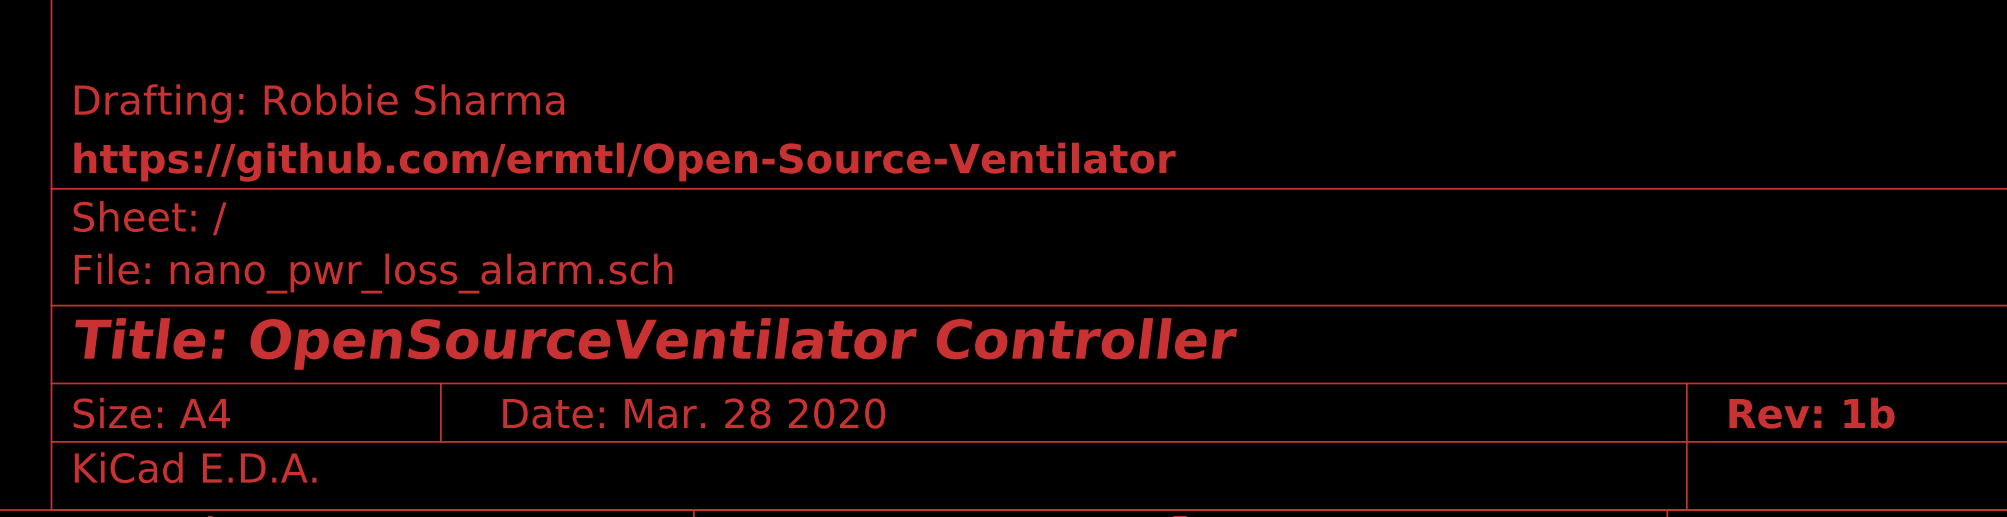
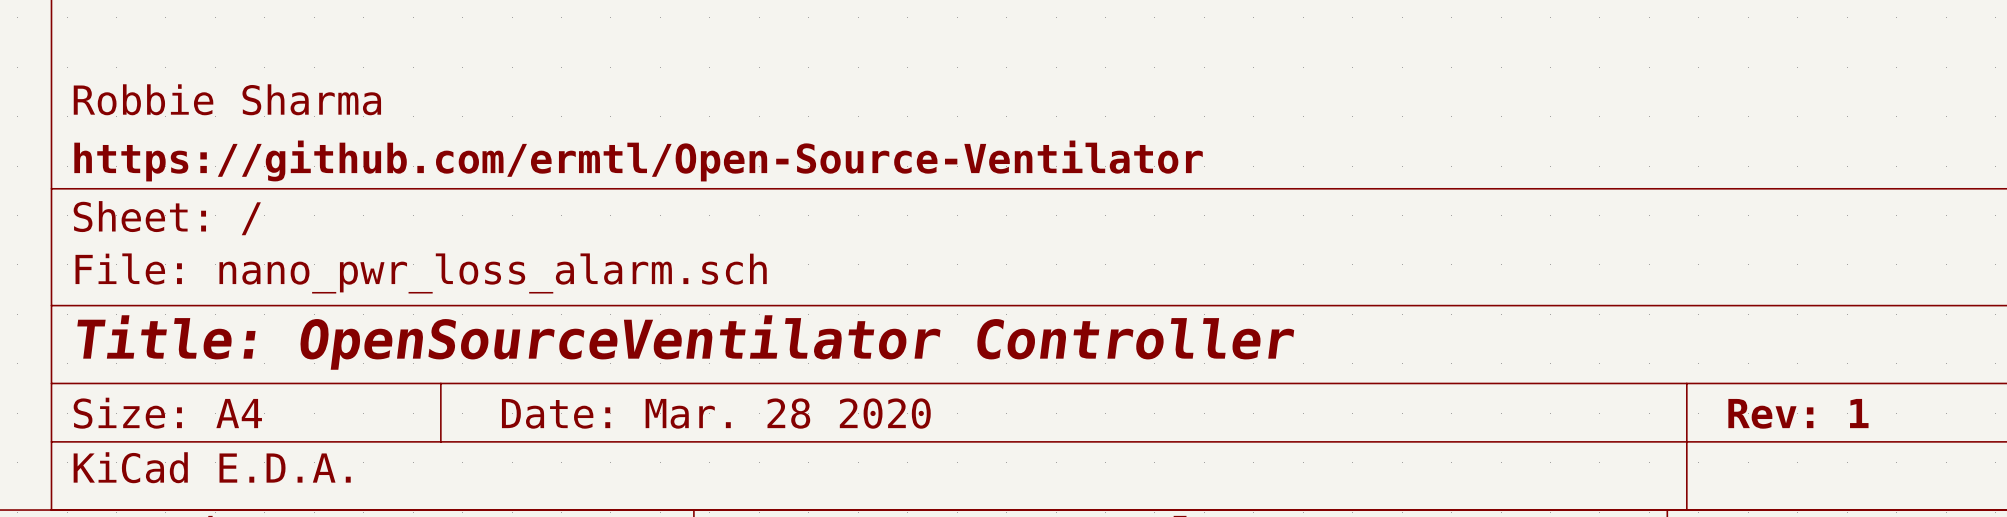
title block: Drafting: Robbie Sharma (319, 103) -> Robbie Sharma (227, 99)
title block: Rev: 1b (1812, 413) -> Rev: 1 (1798, 413)

